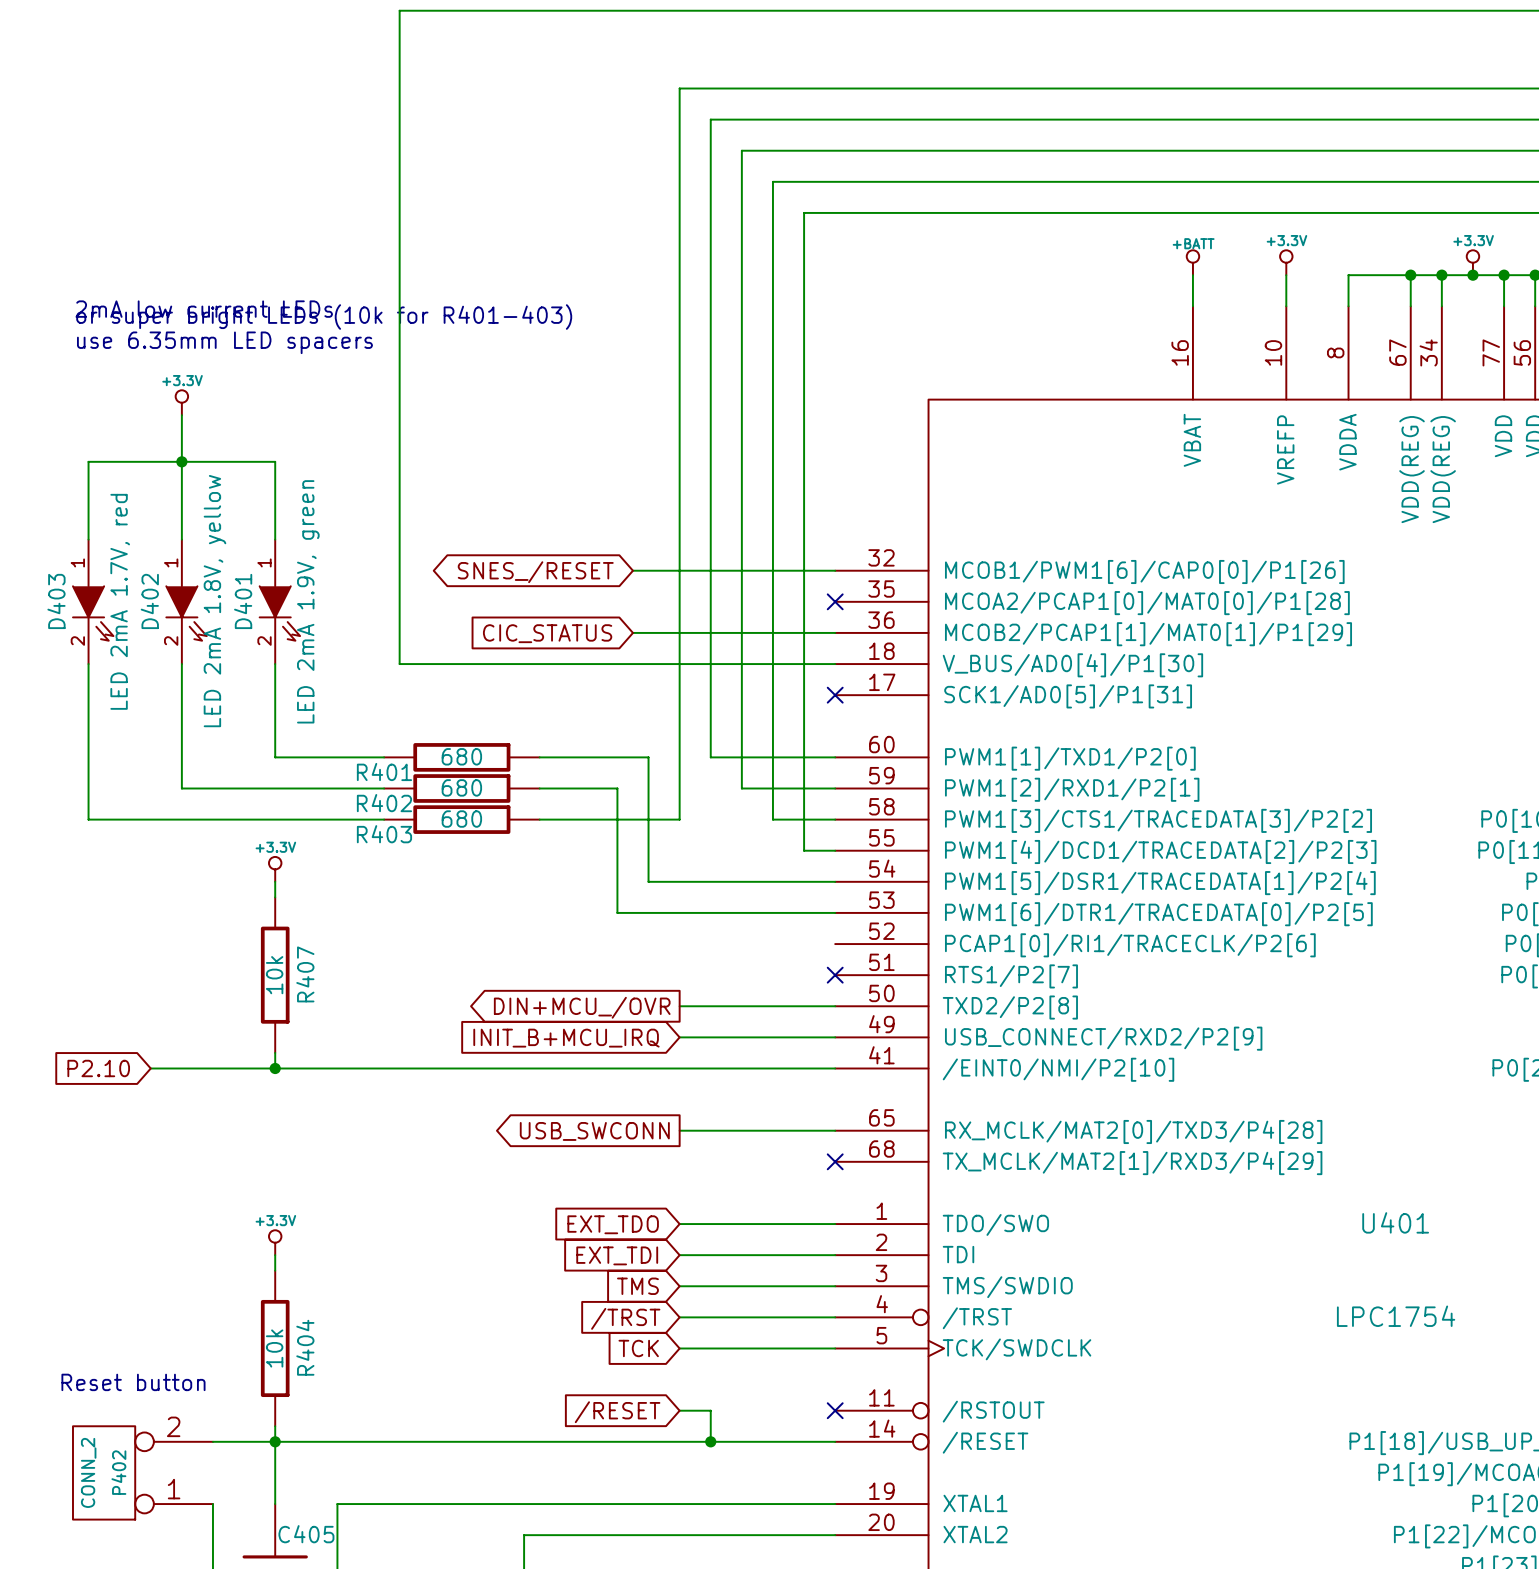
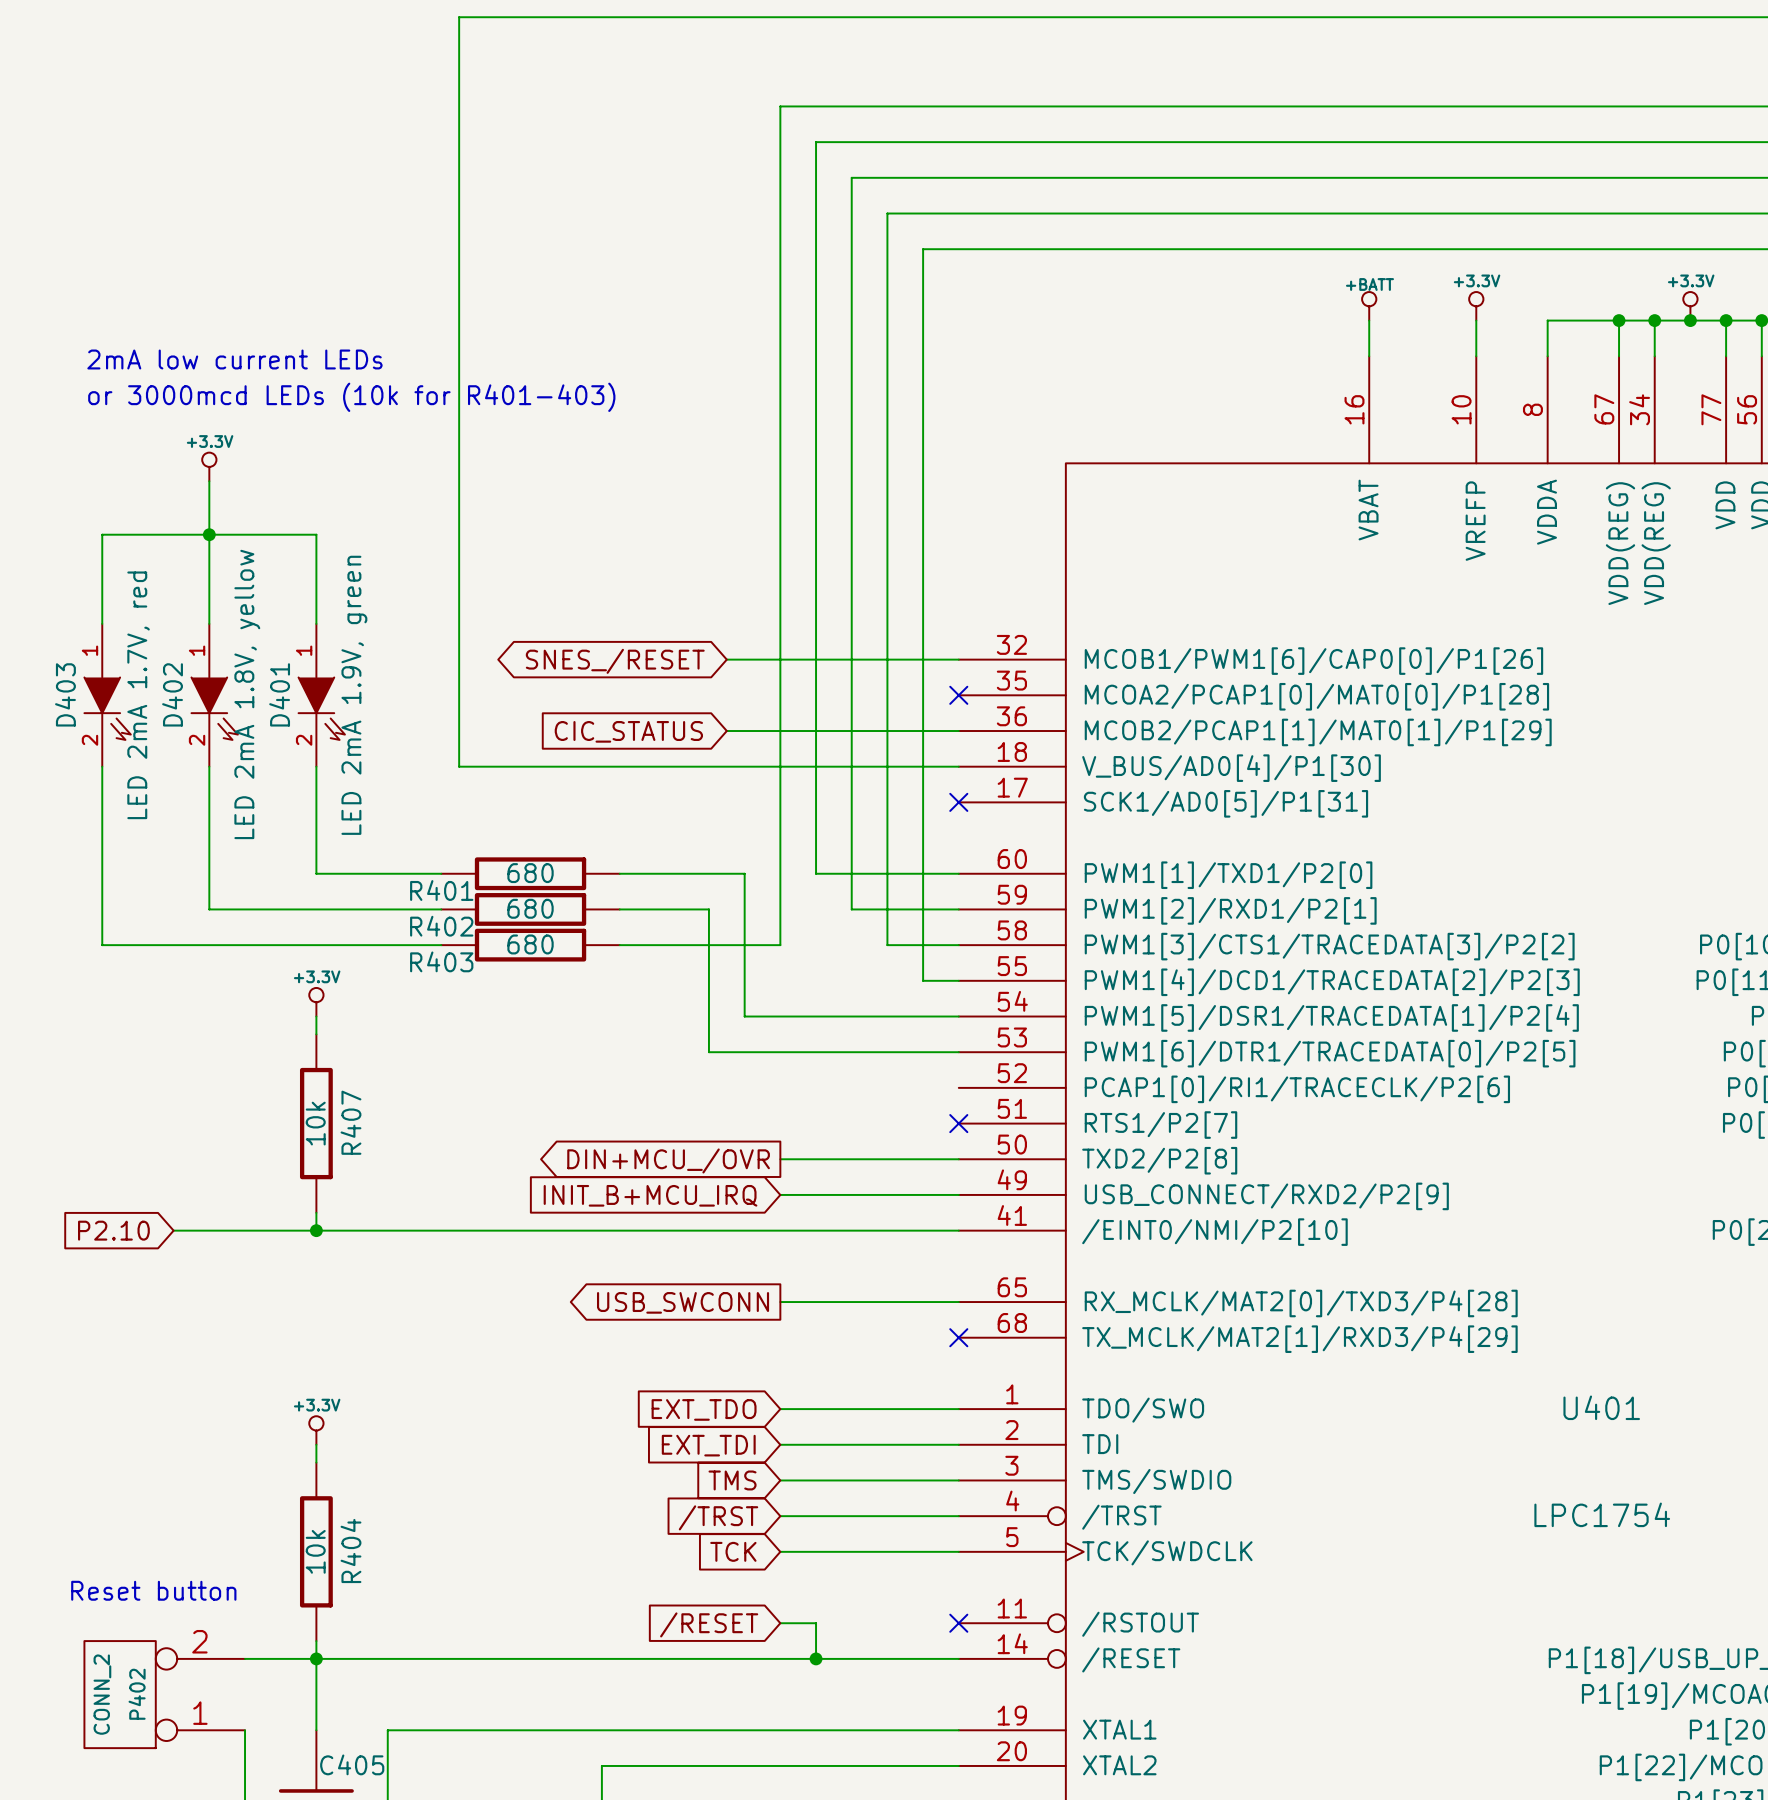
text: or super bright LEDs (10k for R401-403) (324, 317) -> none
text: use 6.35mm LED spacers (224, 342) -> or 3000mcd LEDs (10k for R401-403) (351, 397)

